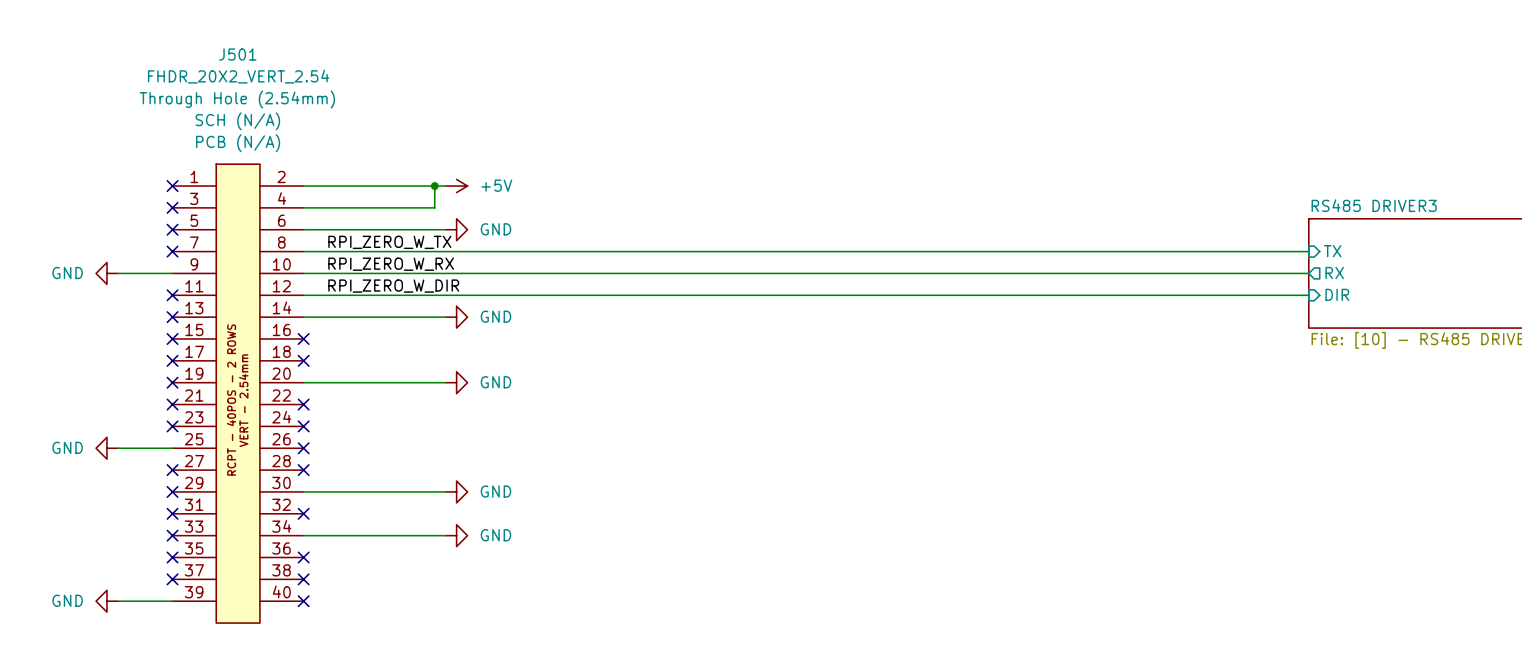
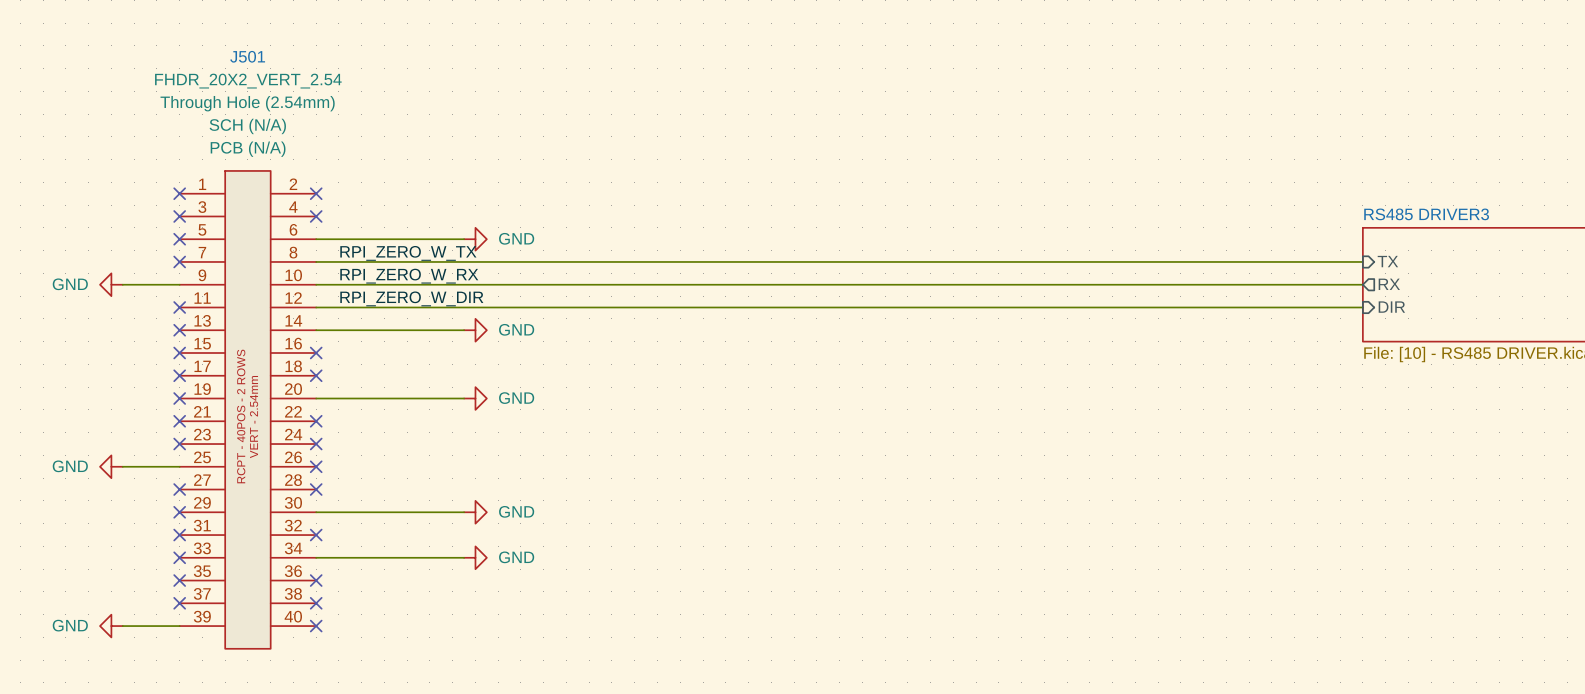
wire: (303, 186) (445, 186) -> none
no-connect mark: none -> (316, 193)
wire: (434, 186) (434, 207) (303, 207) -> none
junction: (434, 186) -> none
power symbol: +5V (456, 186) -> none
no-connect mark: none -> (316, 216)

